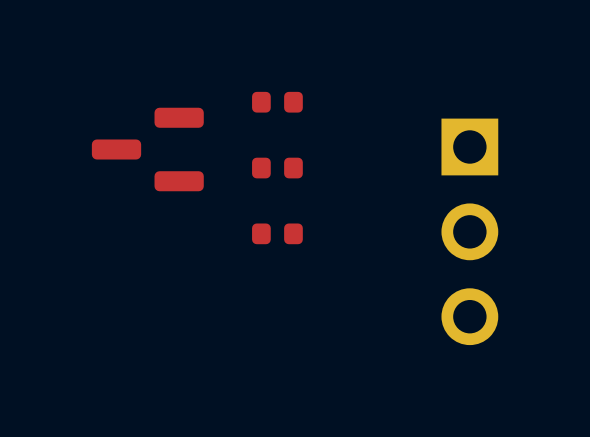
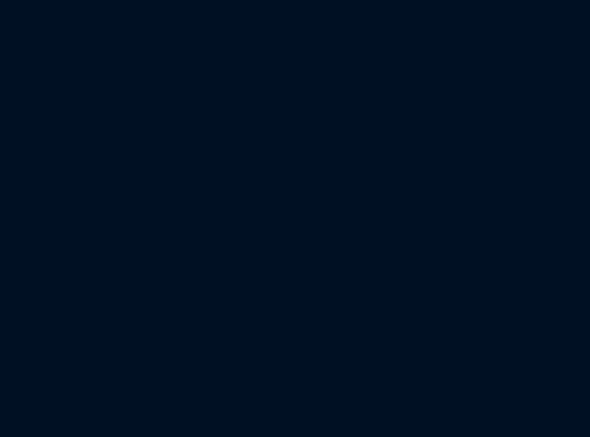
part: (277, 102) -> none
part: (147, 149) -> none
part: (277, 168) -> none
part: (469, 231) -> none
part: (277, 233) -> none

